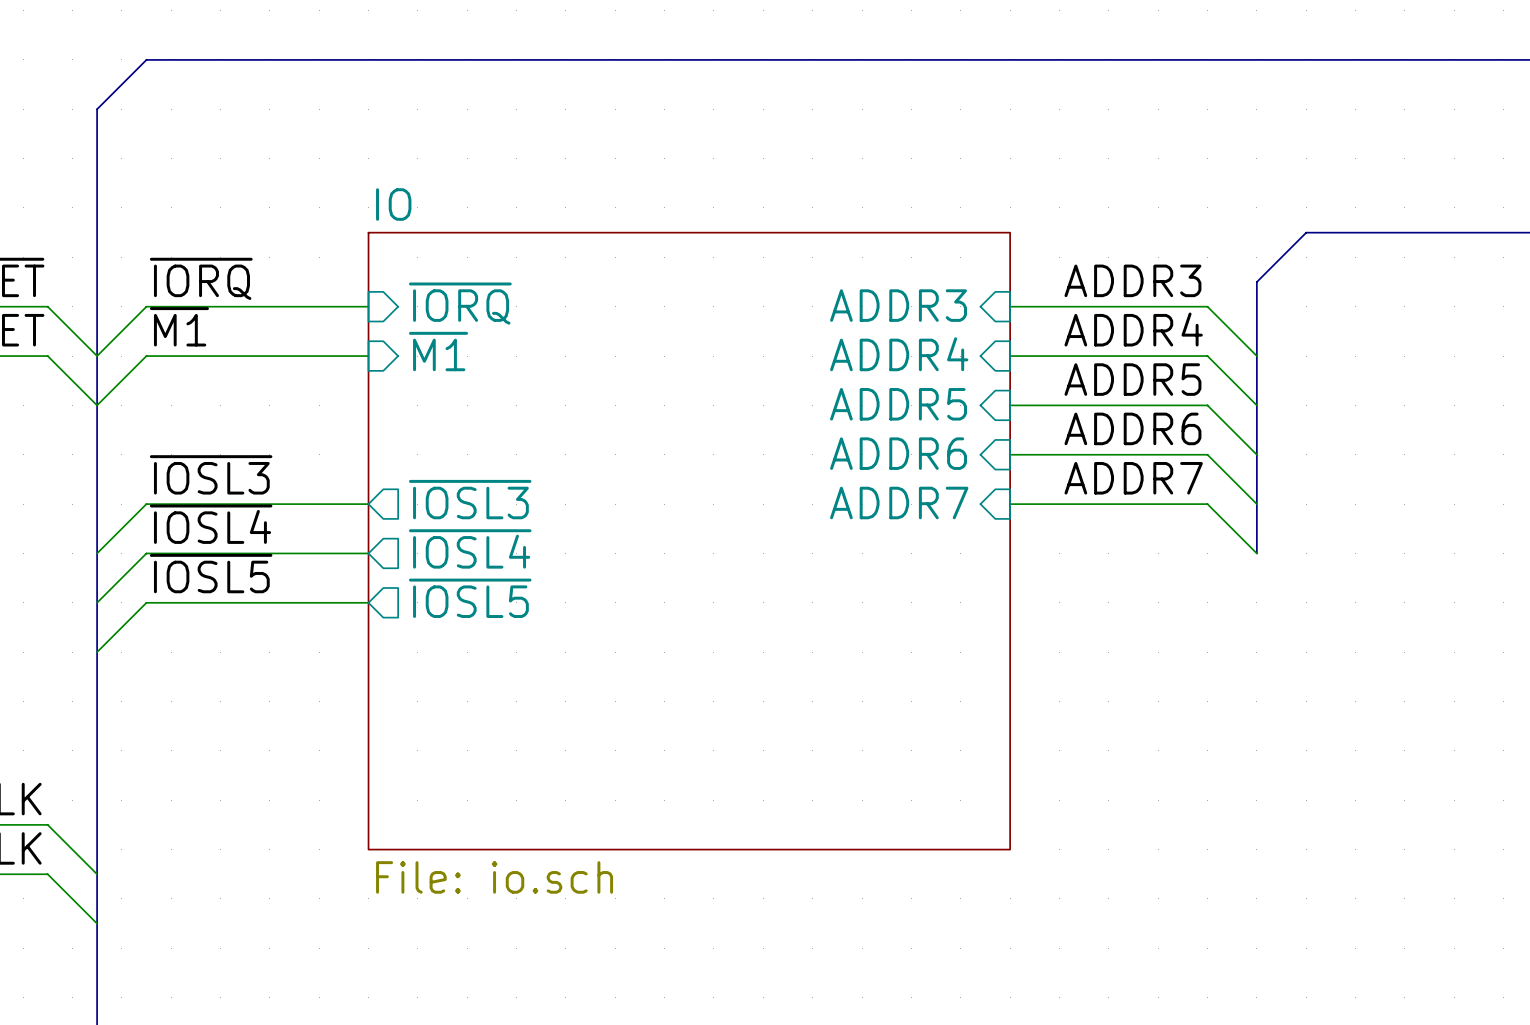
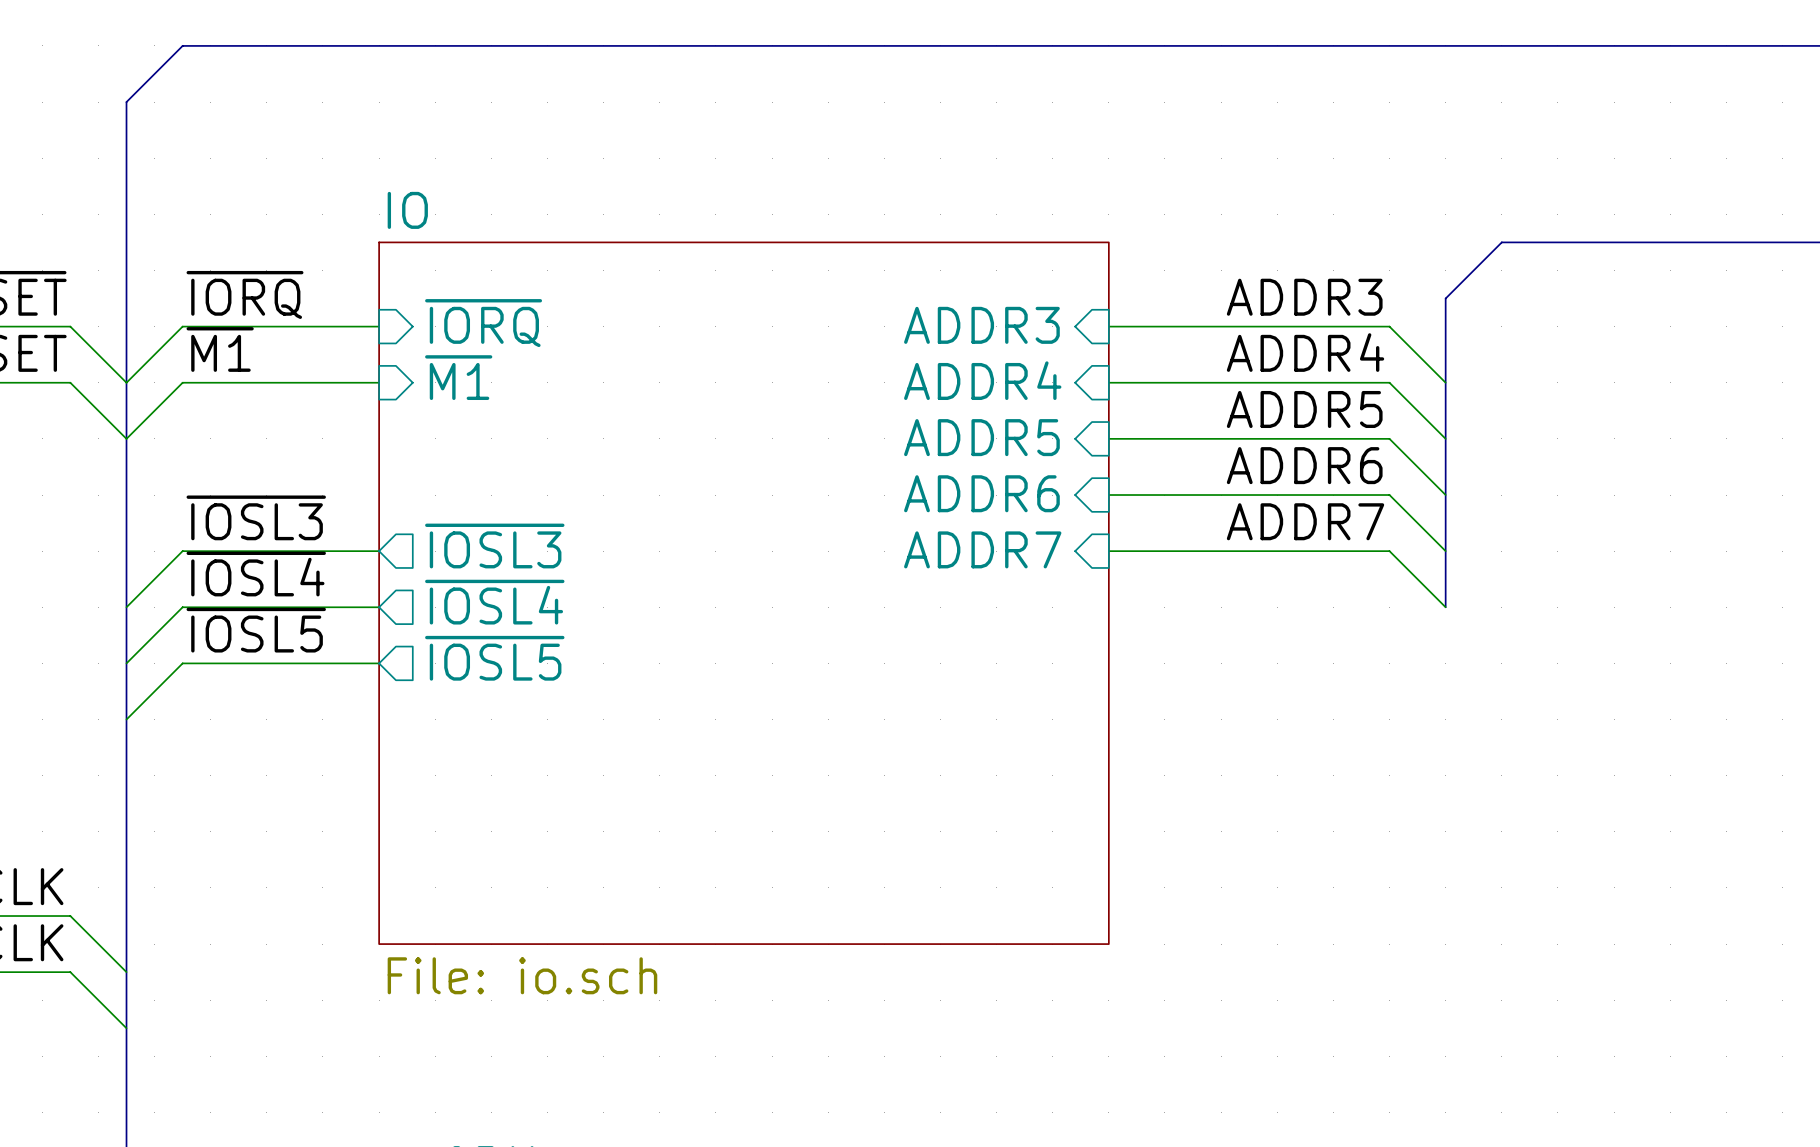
sheet pin position: ~{IORQ} (460, 303) -> ~{IORQ} (483, 323)
sheet pin position: ADDR3 (898, 305) -> ADDR3 (981, 325)
wire: (319, 306) (368, 306) -> none
wire: none -> (1108, 326) (1164, 326)
sheet pin position: ~{M1} (438, 351) -> ~{M1} (458, 377)
sheet pin position: ADDR4 (899, 354) -> ADDR4 (982, 380)
wire: (319, 356) (368, 356) -> none
wire: none -> (1108, 382) (1164, 382)
sheet pin position: ADDR5 (898, 404) -> ADDR5 (981, 437)
wire: none -> (1108, 438) (1164, 438)
sheet pin position: ADDR6 (898, 453) -> ADDR6 (981, 493)
wire: none -> (1108, 495) (1164, 495)
sheet pin position: ~{IOSL3} (470, 499) -> ~{IOSL3} (494, 546)
sheet pin position: ADDR7 (899, 503) -> ADDR7 (982, 549)
wire: (319, 504) (368, 504) -> none
wire: none -> (1108, 551) (1164, 551)
sheet IO position: (689, 541) -> (743, 593)
sheet pin position: ~{IOSL4} (470, 548) -> ~{IOSL4} (494, 602)
wire: (319, 553) (368, 553) -> none
sheet pin position: ~{IOSL5} (470, 598) -> ~{IOSL5} (494, 658)
wire: (319, 602) (368, 602) -> none

